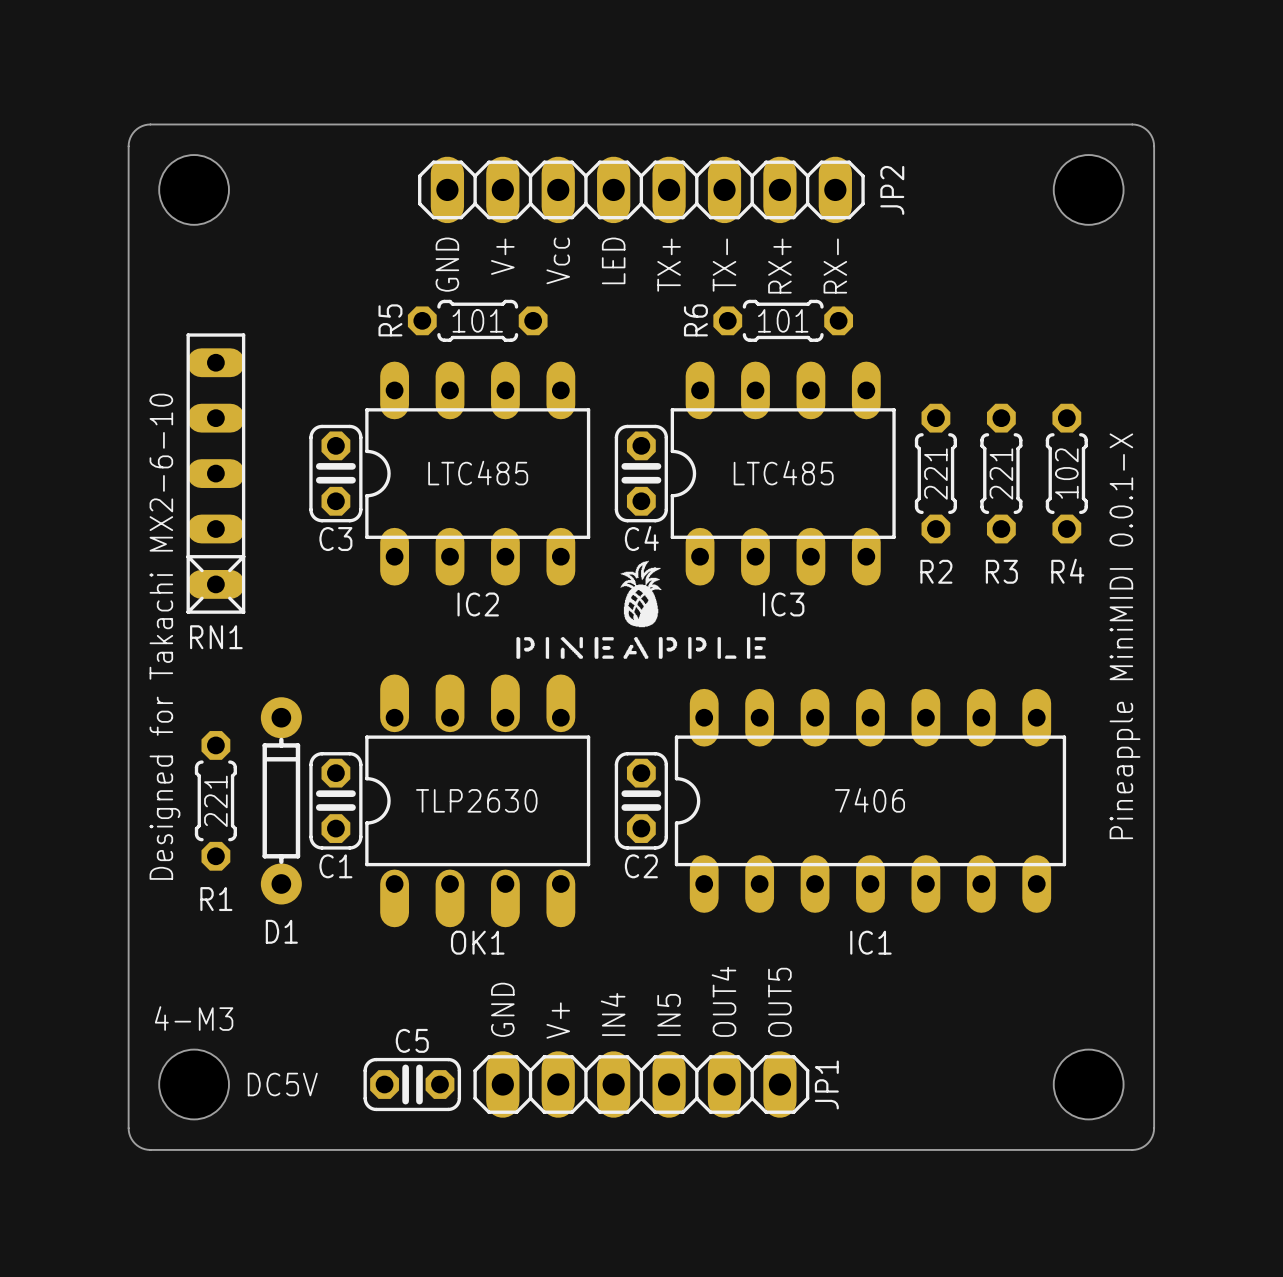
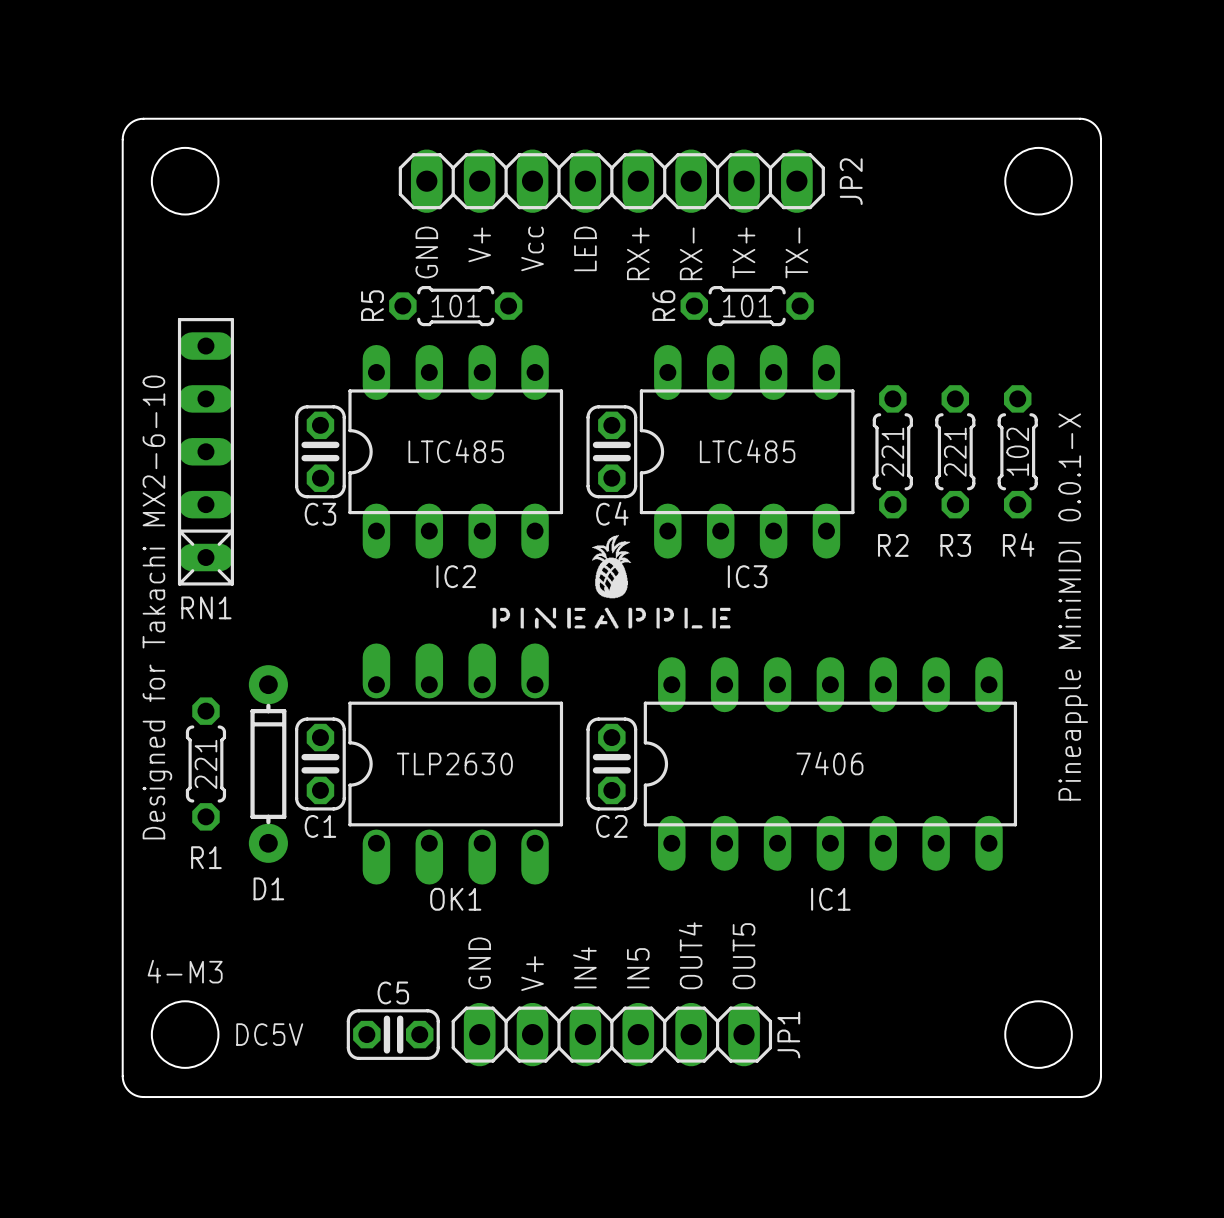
text: TX+ (669, 265) -> RX+ (638, 253)
text: TX- (724, 265) -> RX- (691, 253)
text: RX+ (779, 266) -> TX+ (744, 252)
text: RX- (835, 266) -> TX- (796, 252)

